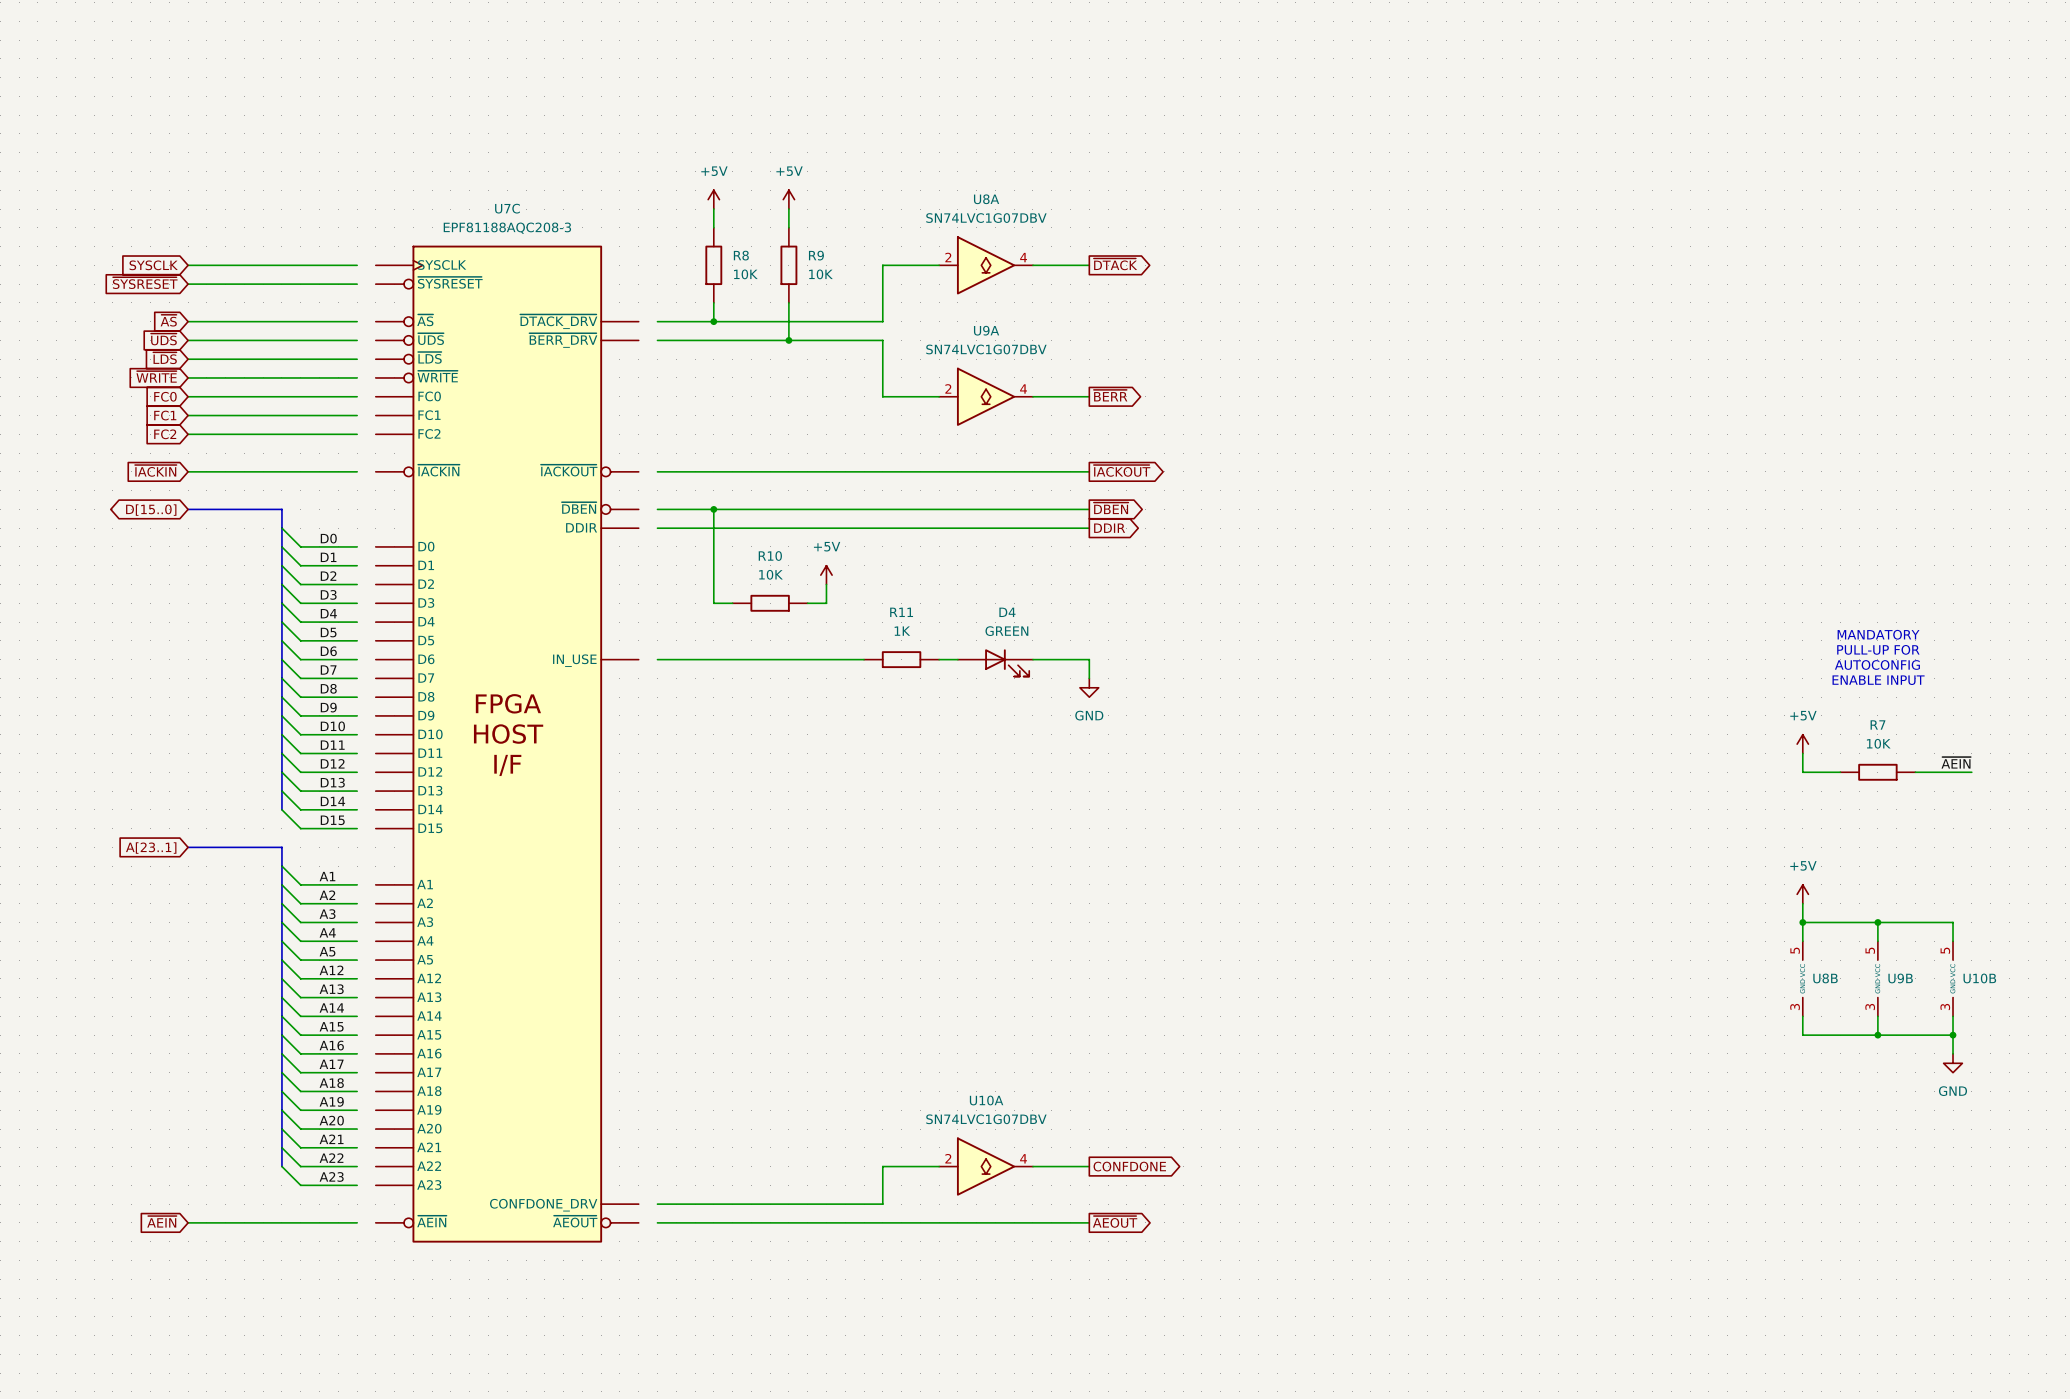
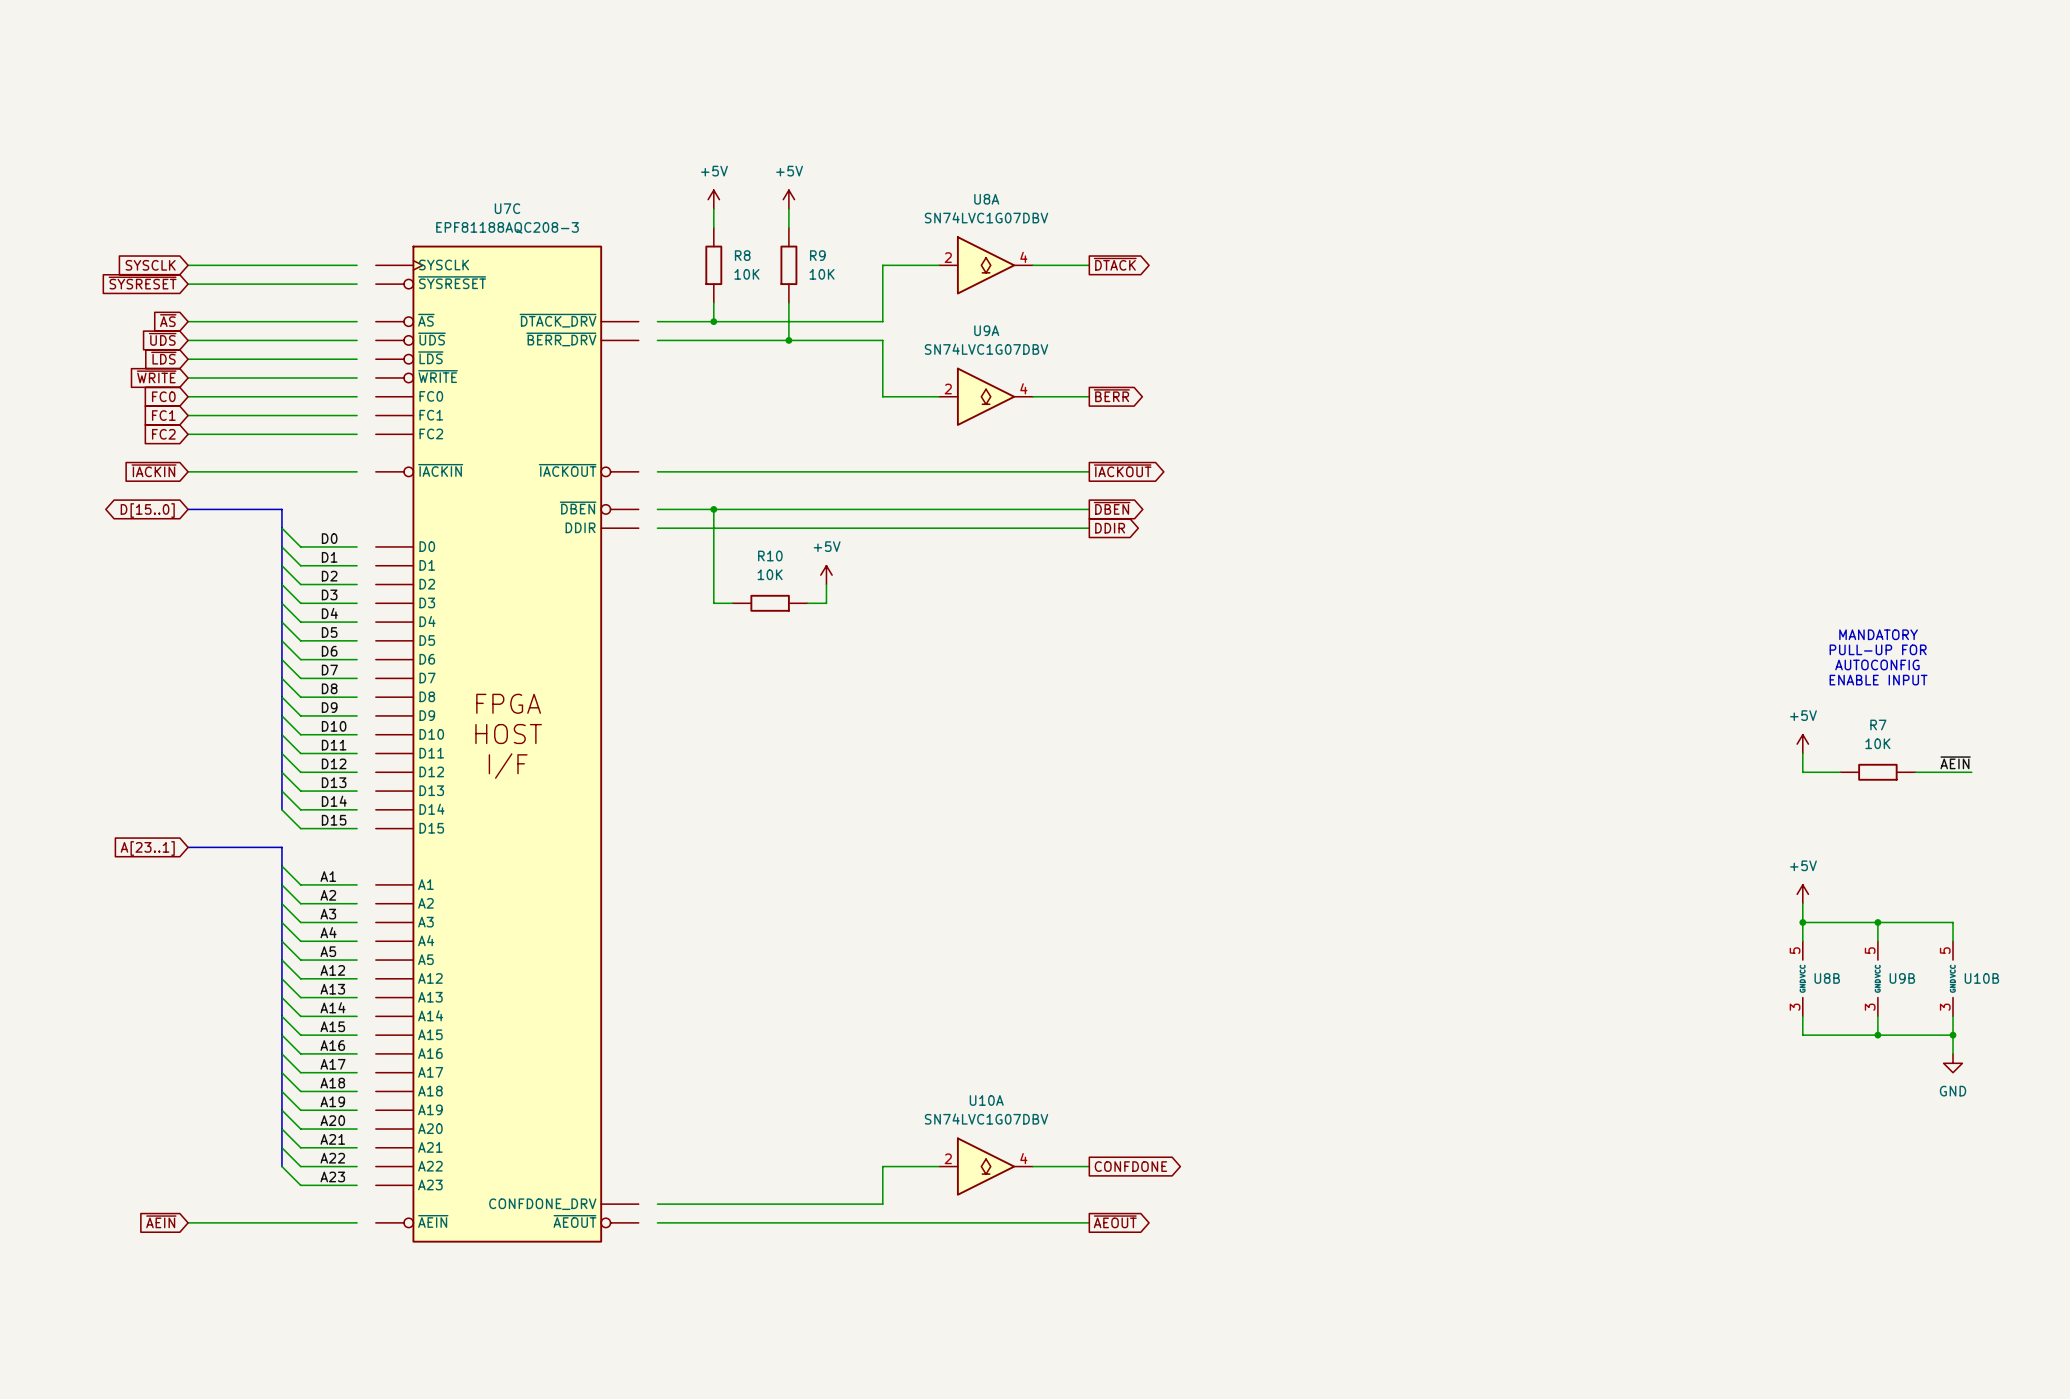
U7C symbol: [375, 245, 639, 1243] -> [375, 245, 639, 1243]
wire: (657, 659) (864, 659) -> none
R11: 1K (901, 659) -> none
wire: (939, 659) (957, 659) -> none
wire: (1032, 659) (1089, 659) (1089, 678) -> none
D4: GREEN (995, 662) -> none
power symbol: GND (1089, 687) -> none

